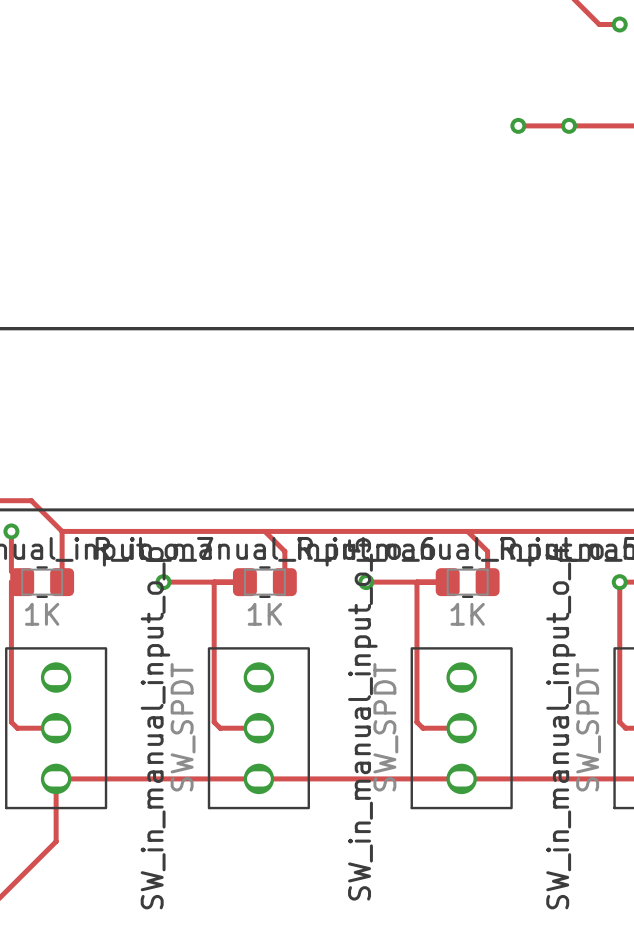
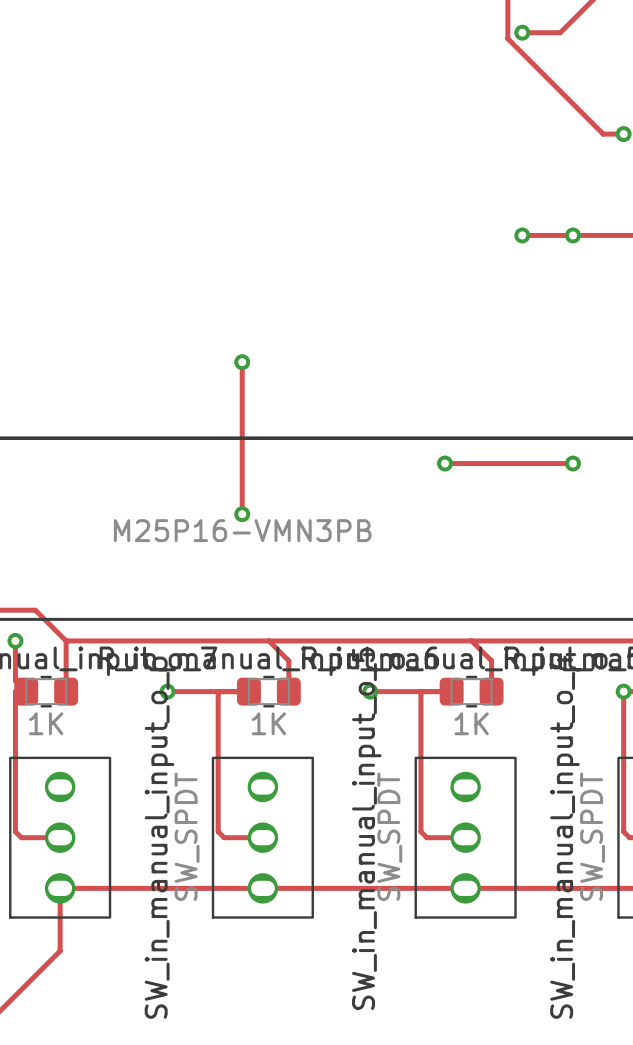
track: none -> (242, 362) (242, 514)
via: none -> (242, 362)
track: none -> (444, 463) (572, 463)
via: none -> (444, 463)
via: none -> (572, 463)
via: none -> (242, 514)
part: none -> M25P16-VMN3PB (242, 530)

